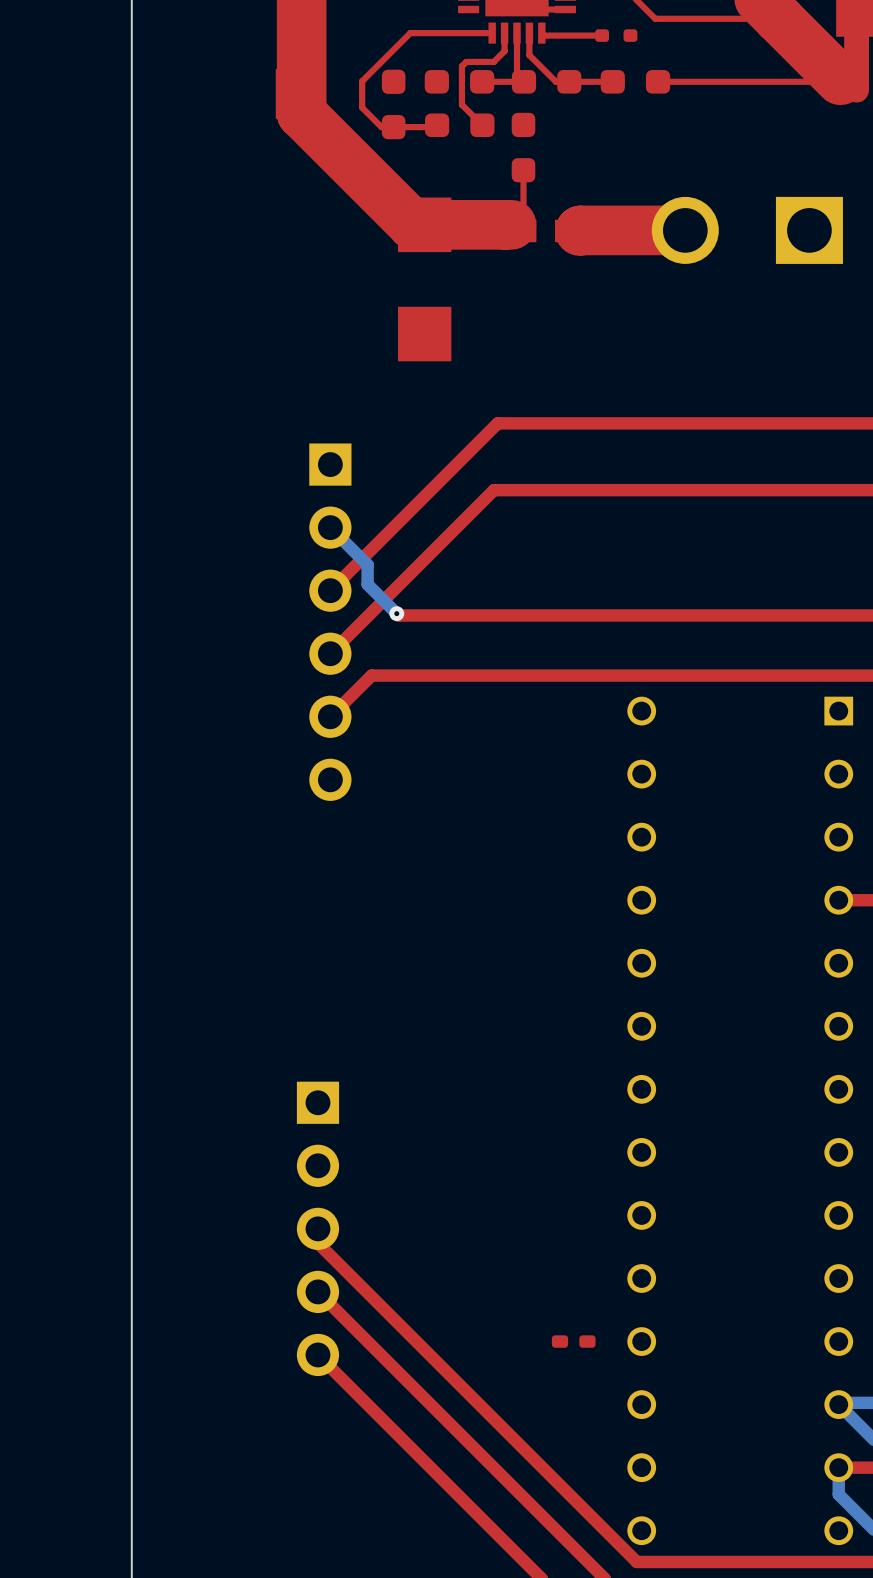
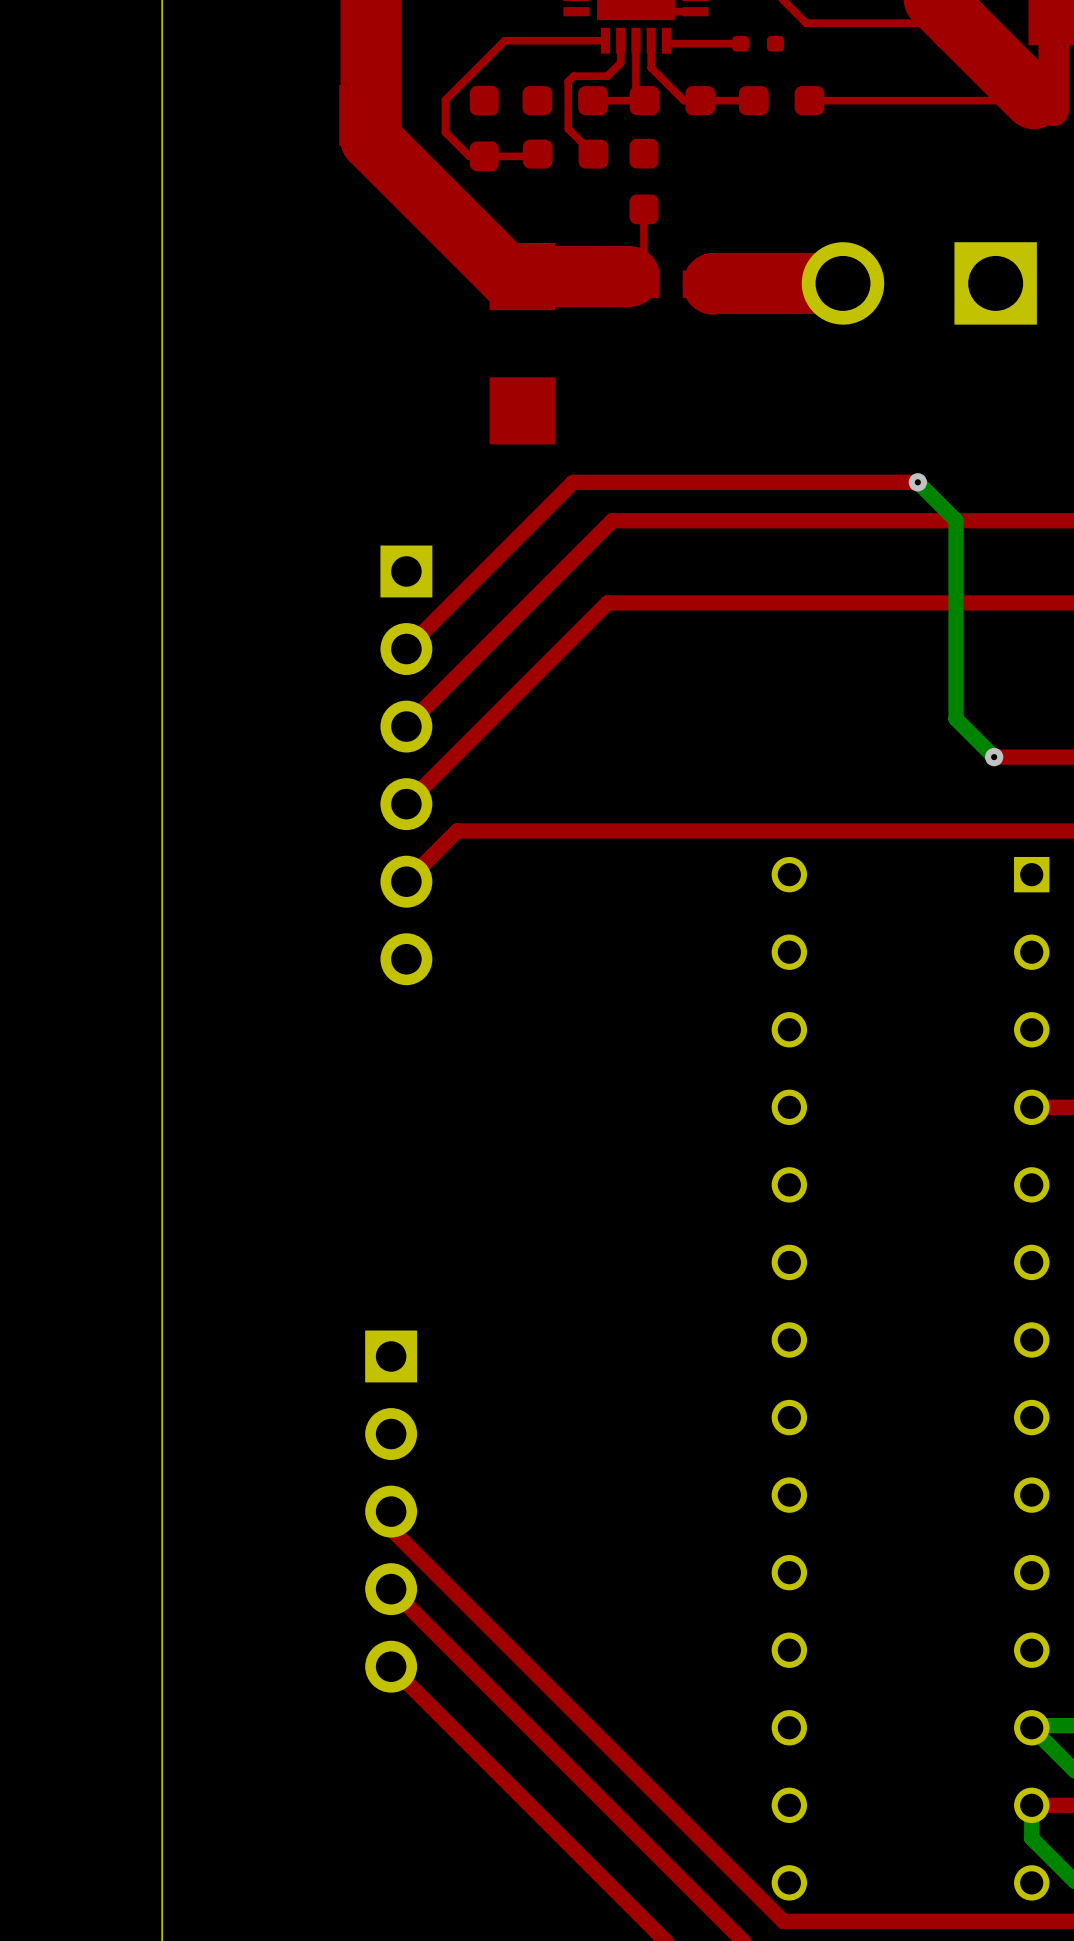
top track: none -> (917, 482) (573, 482) (406, 649)
bottom track: none -> (917, 482) (956, 520) (956, 718) (994, 757)
via: none -> (917, 482)
bottom track: (330, 528) (367, 564) (367, 584) (396, 613) -> none
top track: (396, 613) (398, 615) (808, 615) -> none
via: (396, 613) -> none
via: none -> (994, 757)
part: (573, 1341) -> none

